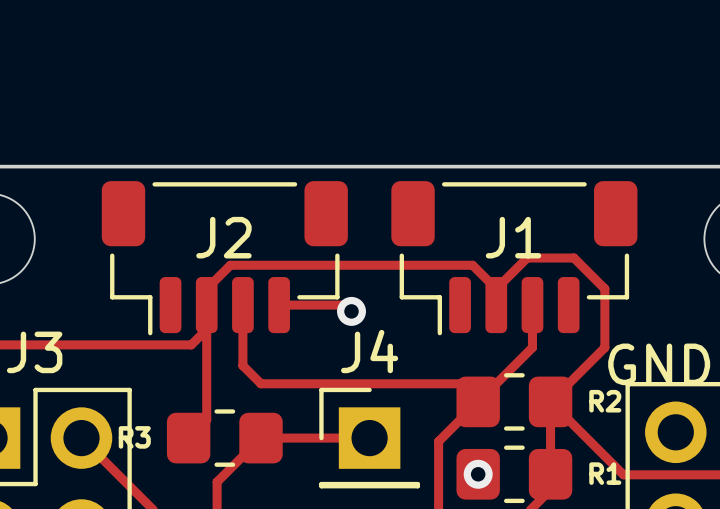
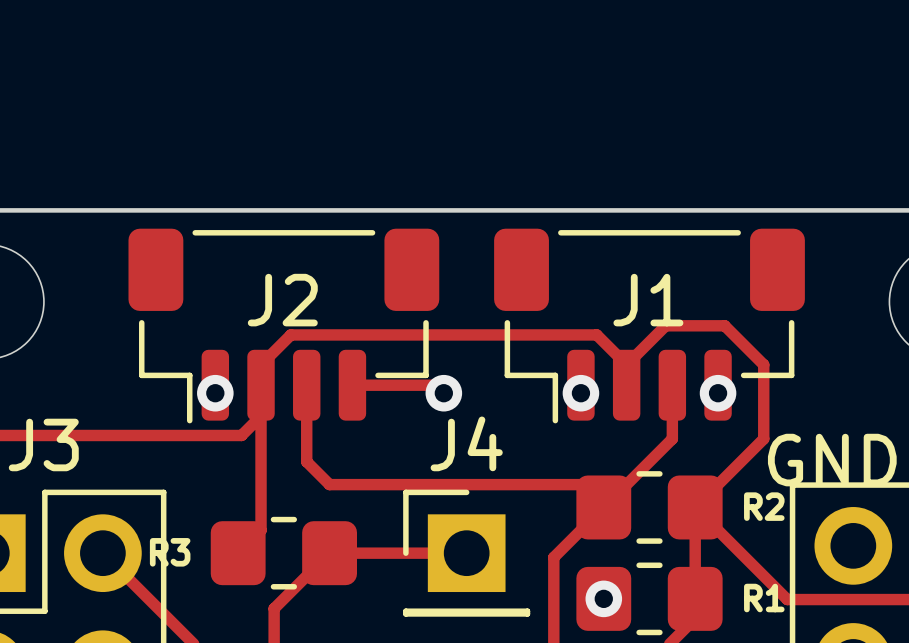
via: none -> (215, 393)
via: none -> (580, 393)
via: none -> (718, 393)

